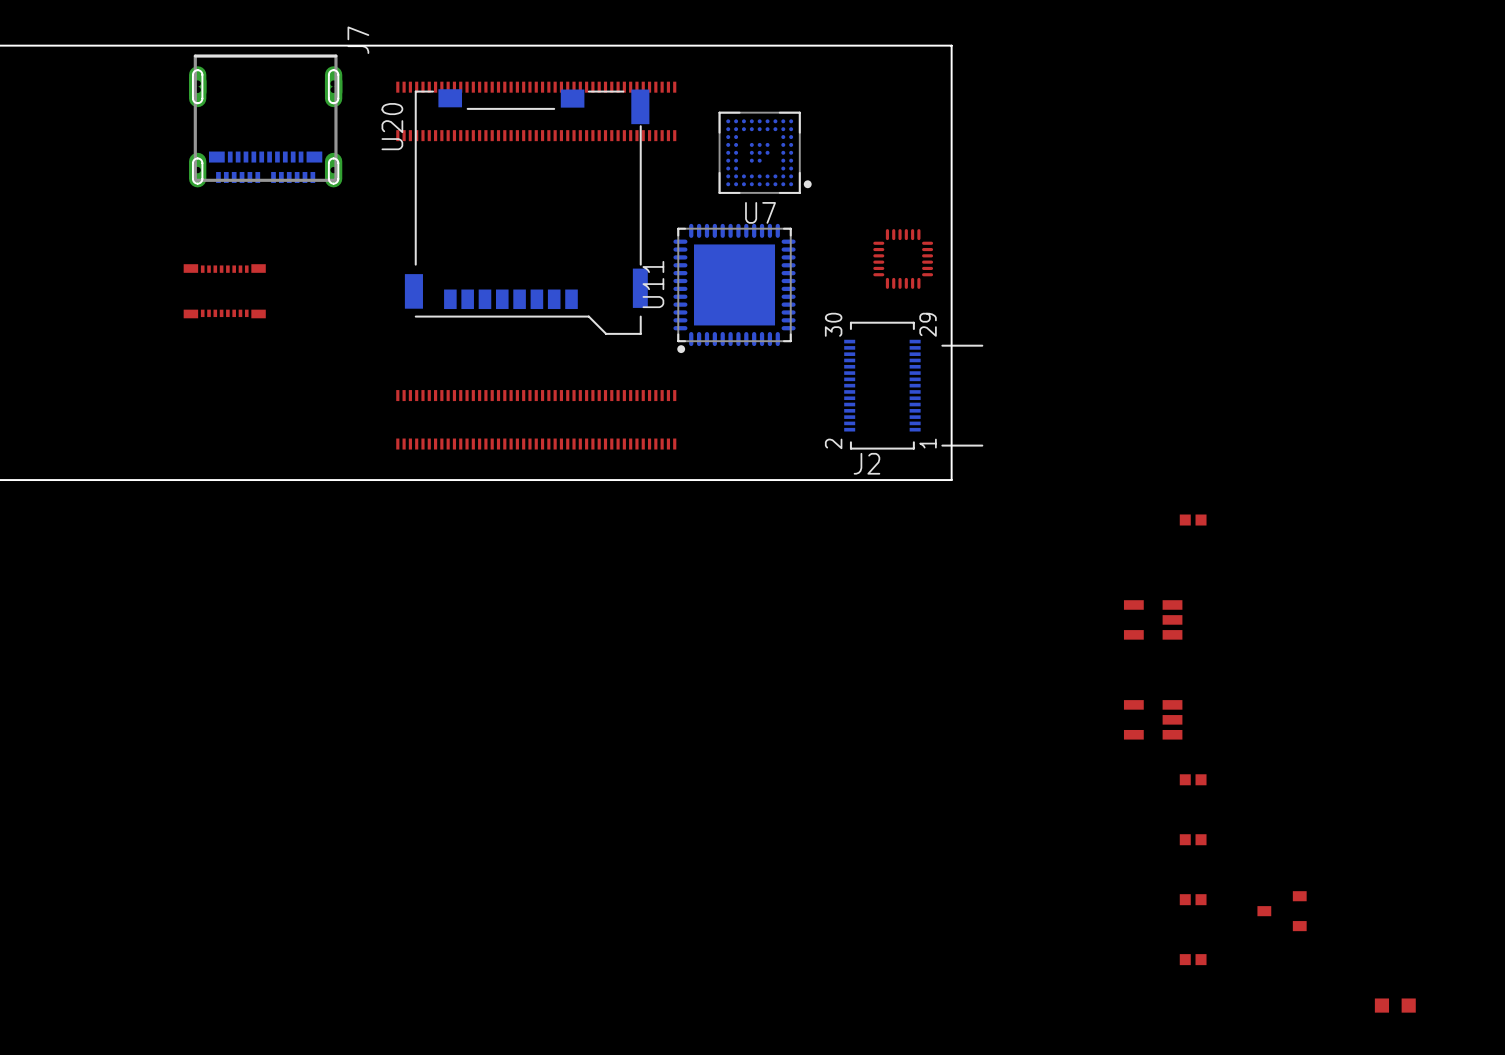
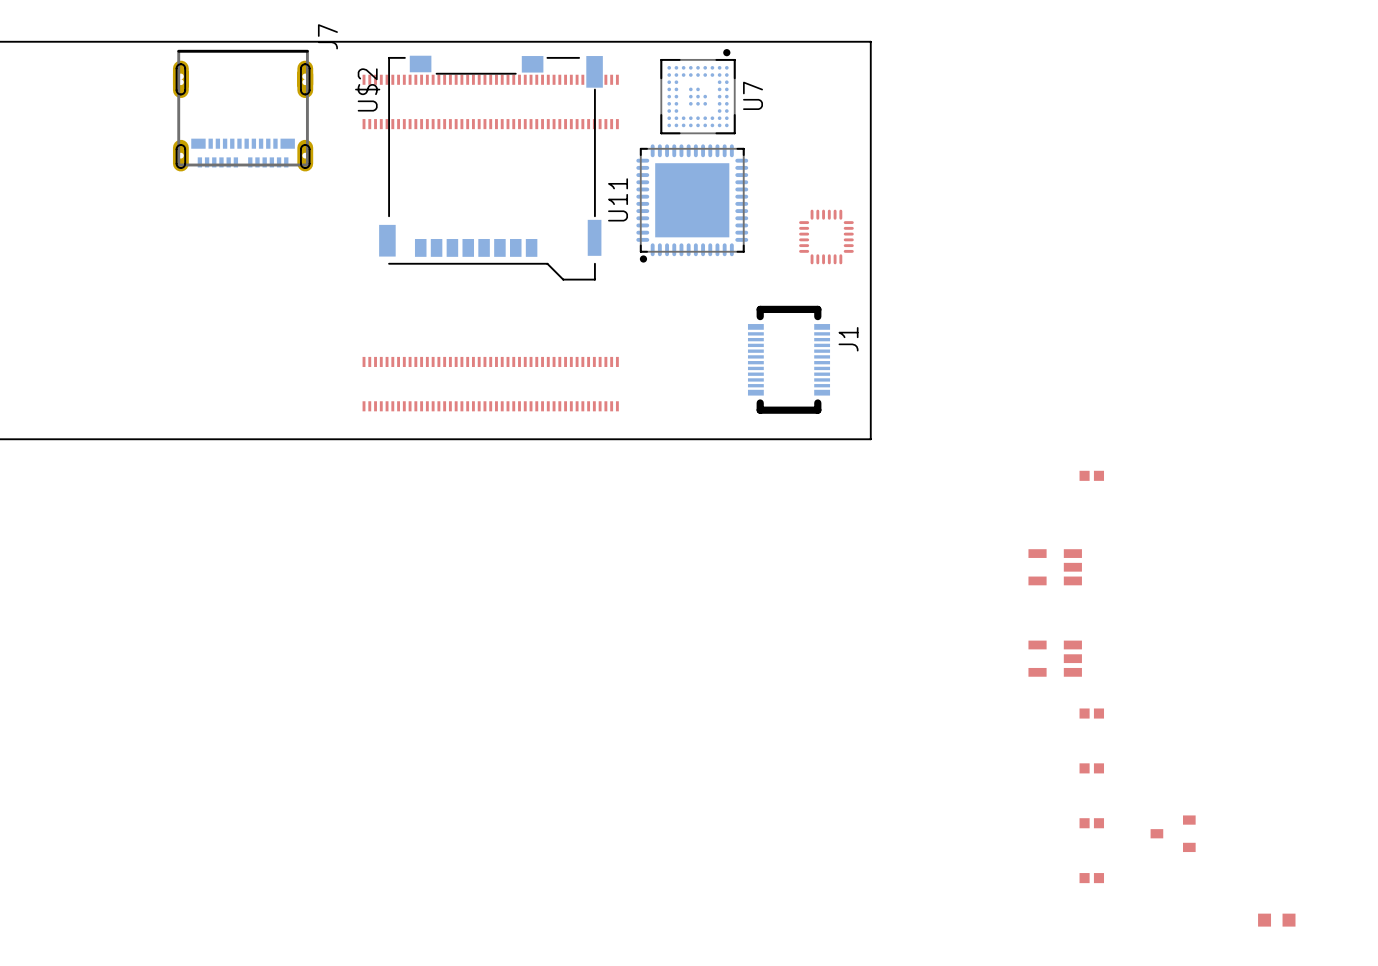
U7 rotation: 0° (765, 152) -> 90° counterclockwise (698, 91)
U$2: none -> (490, 168)
U20: (527, 212) -> none
U11 position: (734, 288) -> (692, 203)
part: (224, 291) -> none
J2: (913, 385) -> none
J1: none -> (789, 359)

